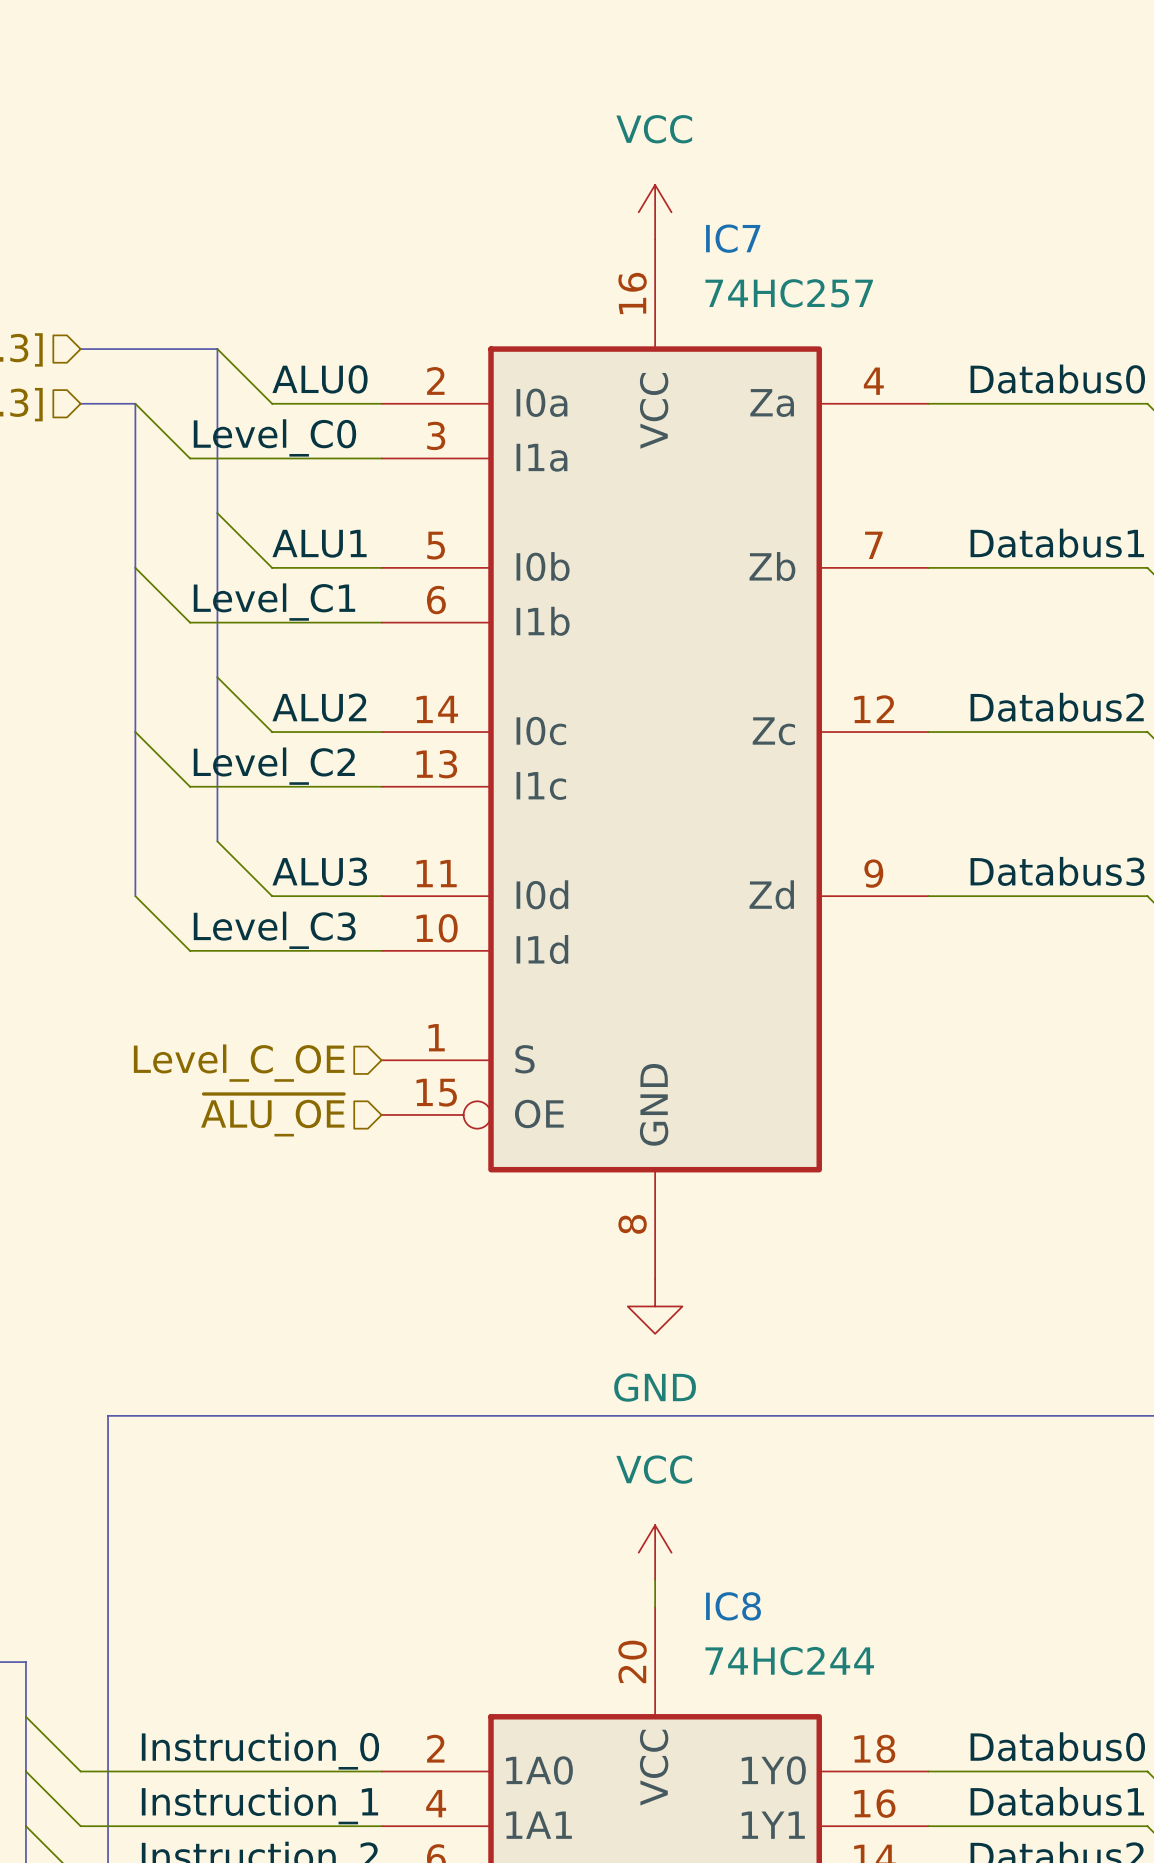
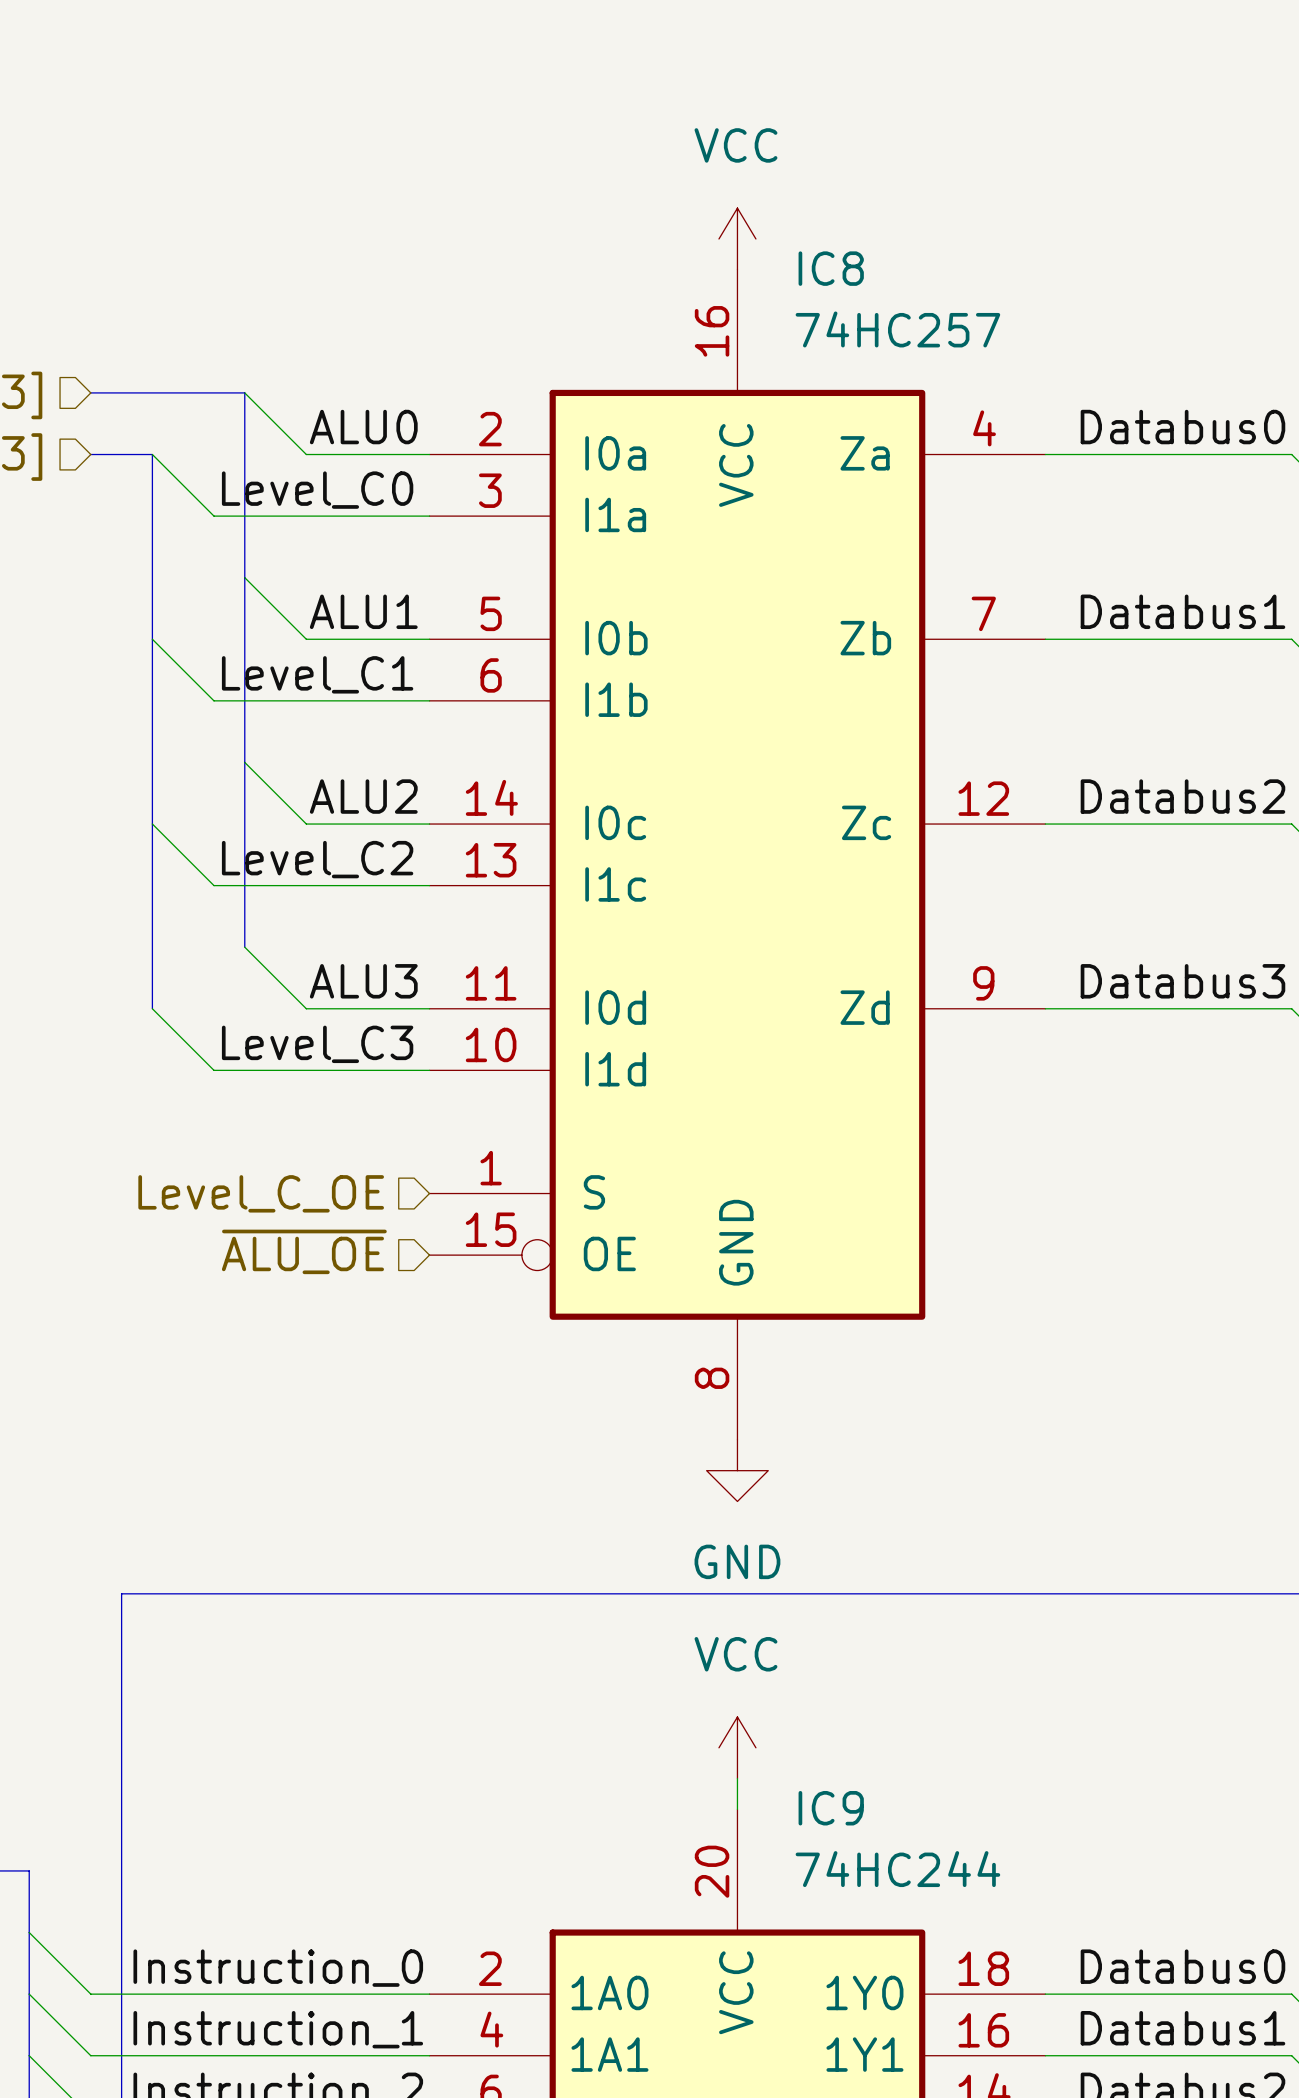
IC7 name: IC7 (733, 238) -> IC8 (831, 268)
IC8 name: IC8 (733, 1606) -> IC9 (831, 1808)

